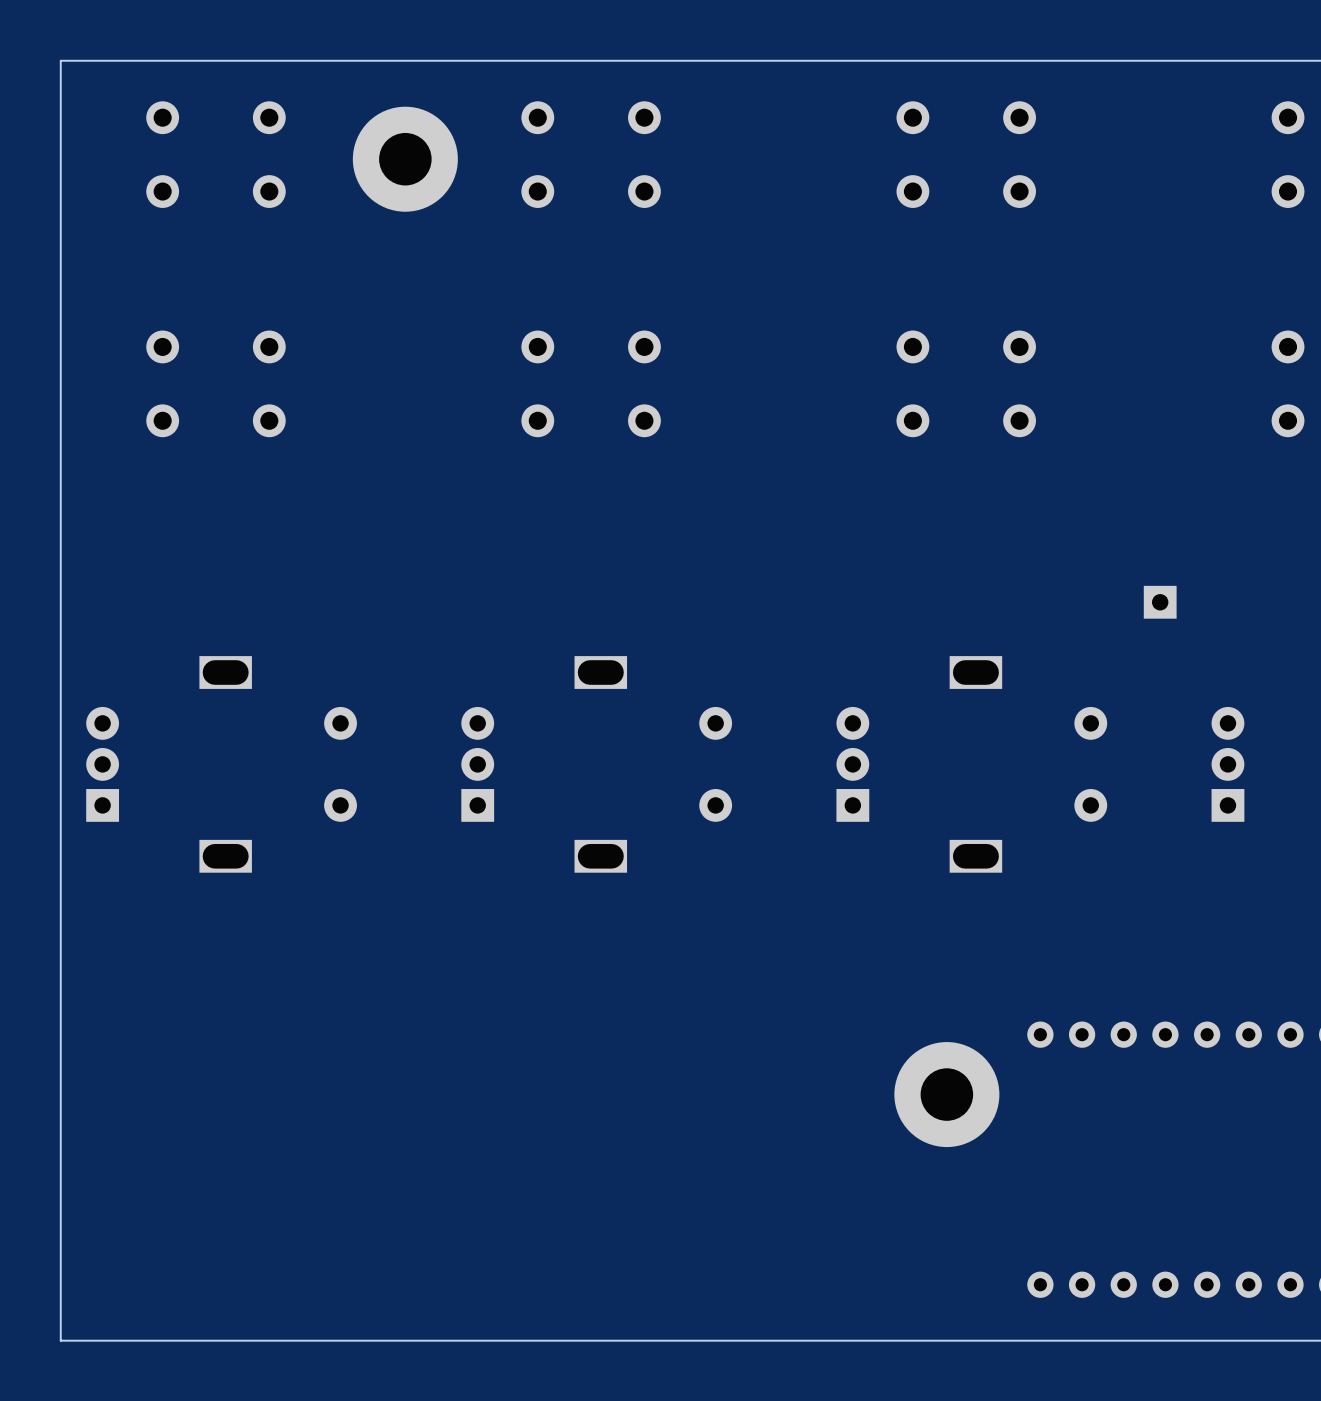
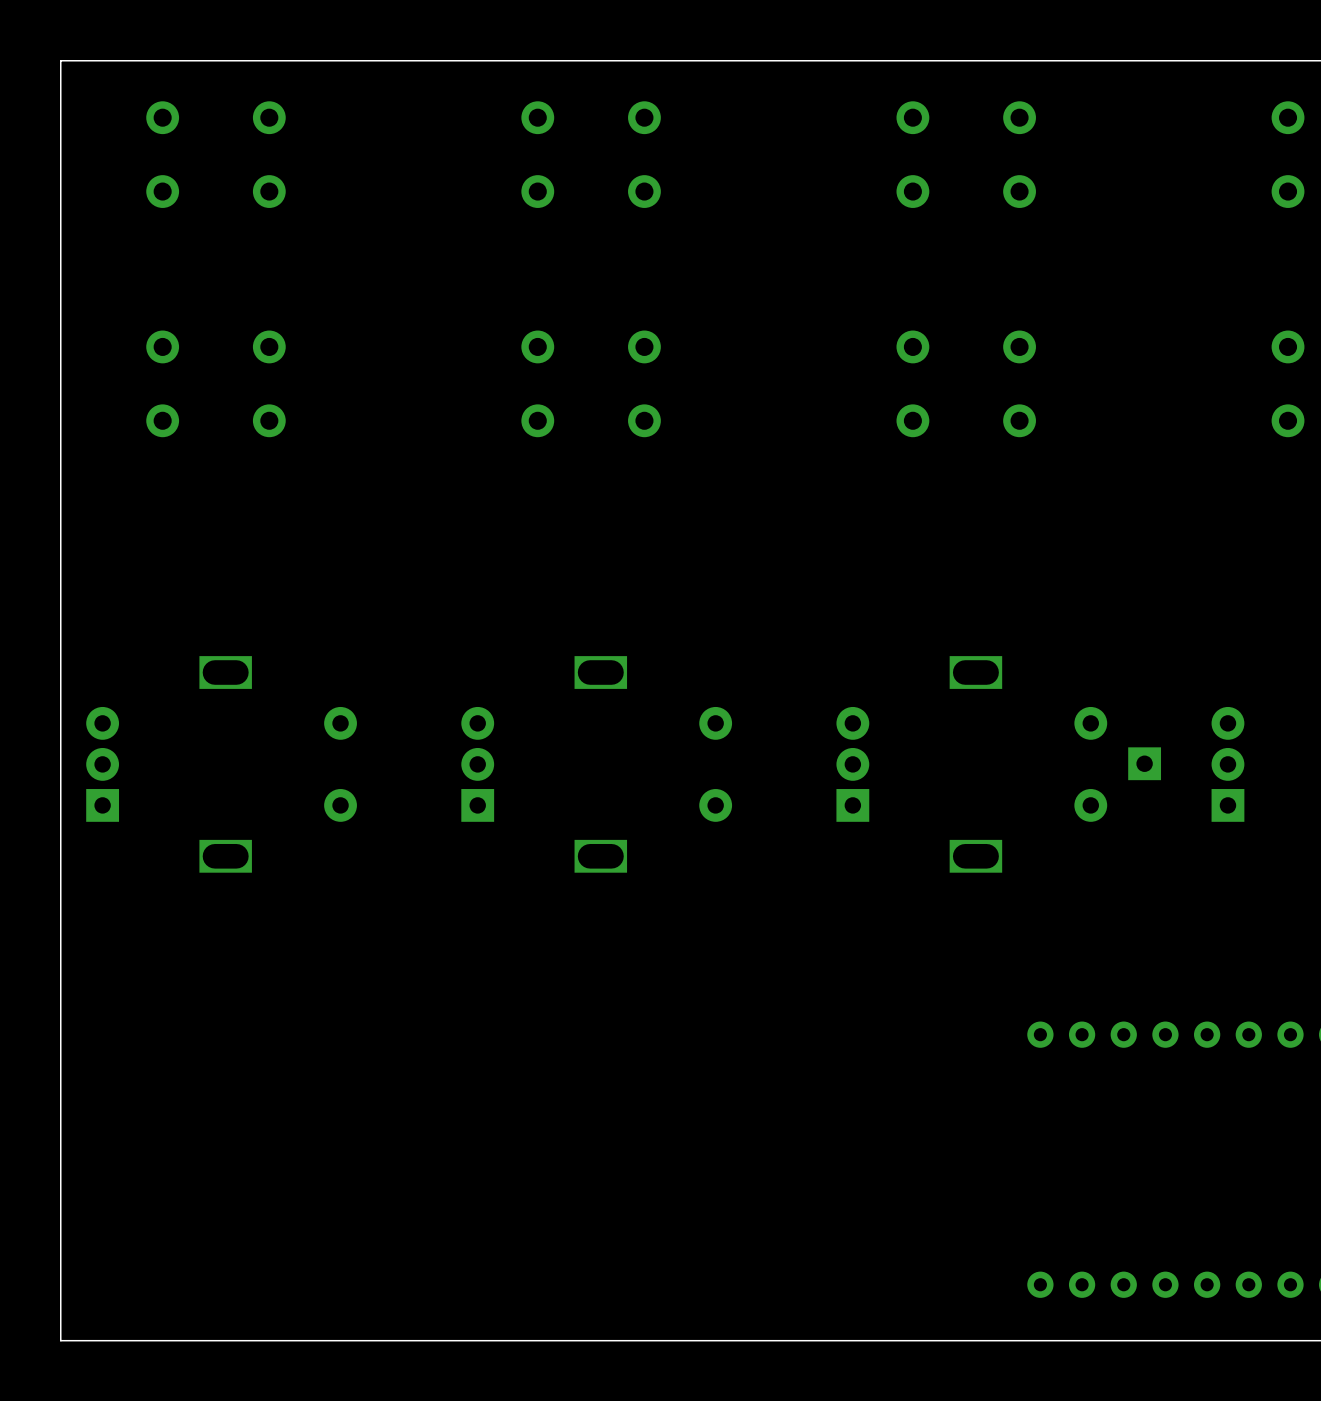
part: (405, 159) -> none
part position: (1160, 602) -> (1144, 763)
part: (946, 1094) -> none

